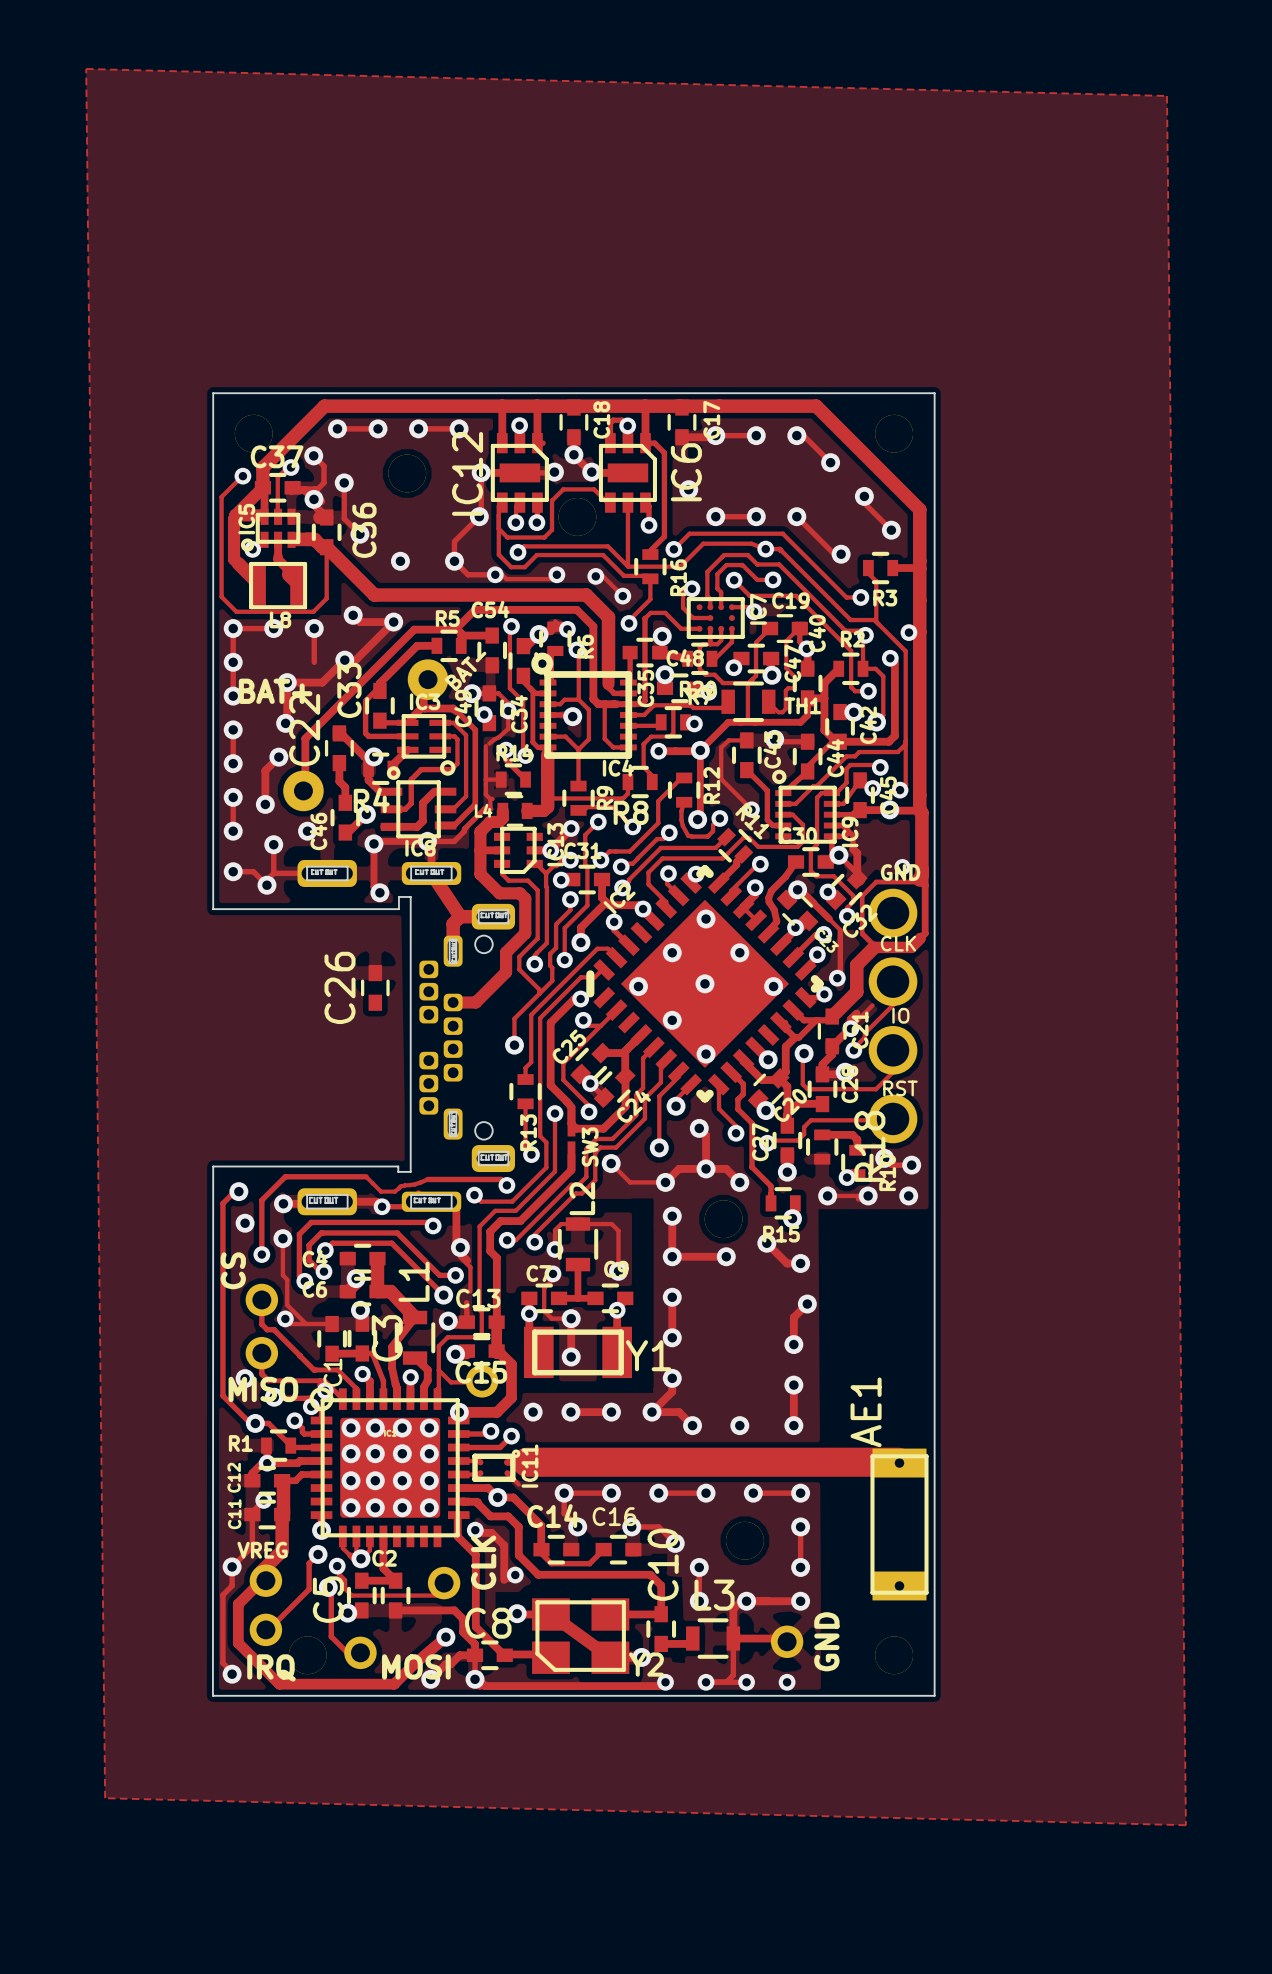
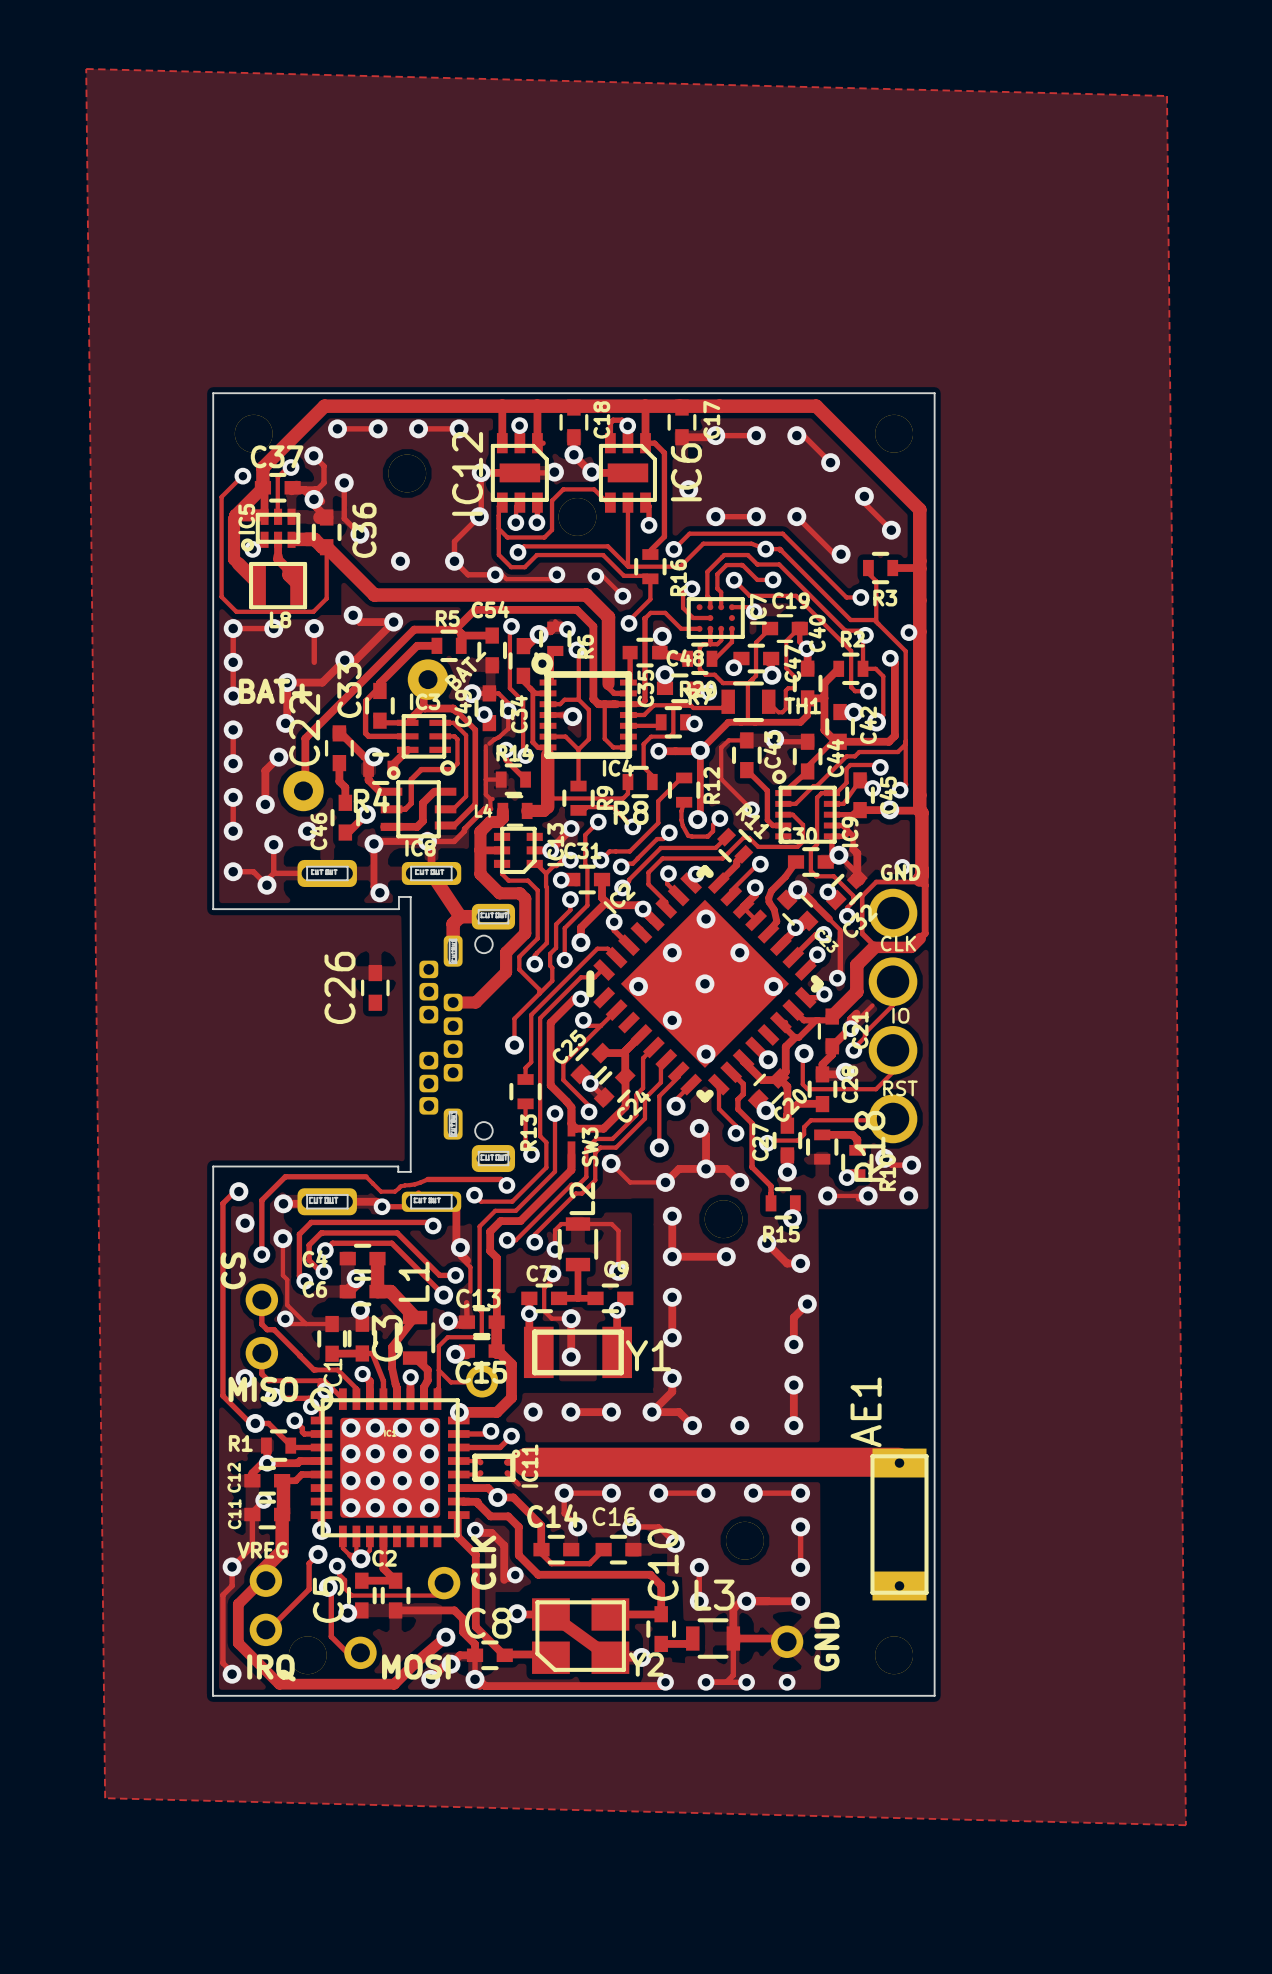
via: none -> (450, 1664)

